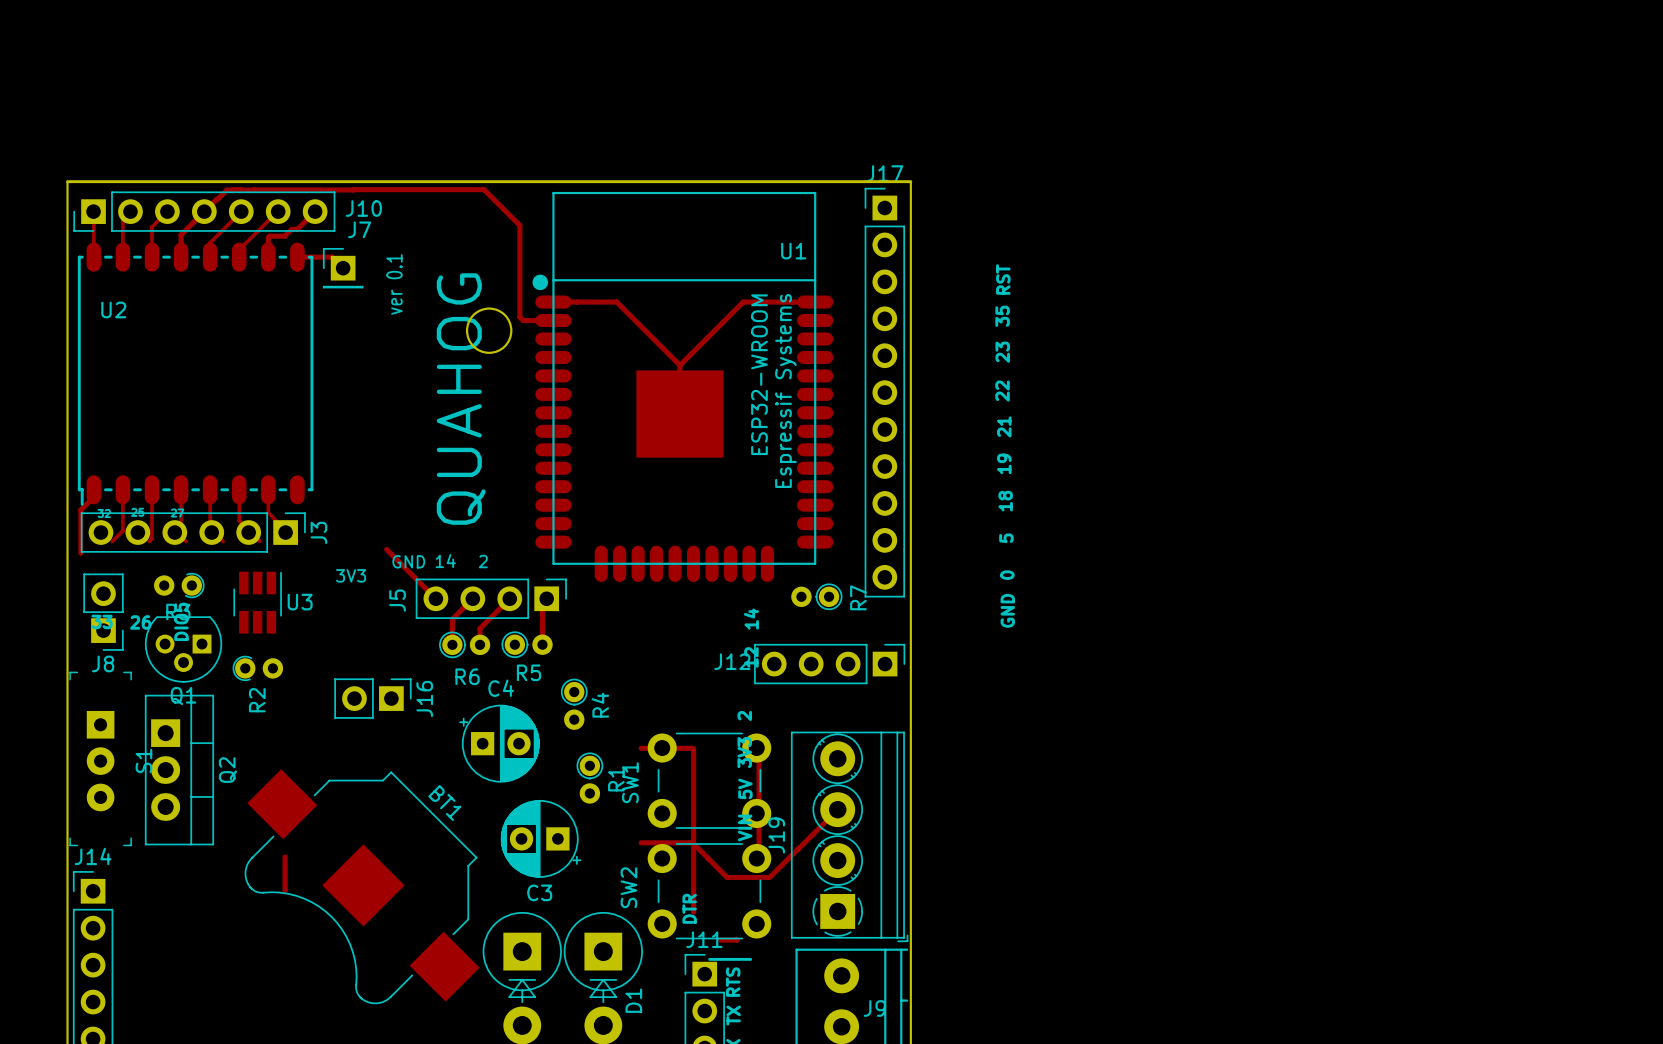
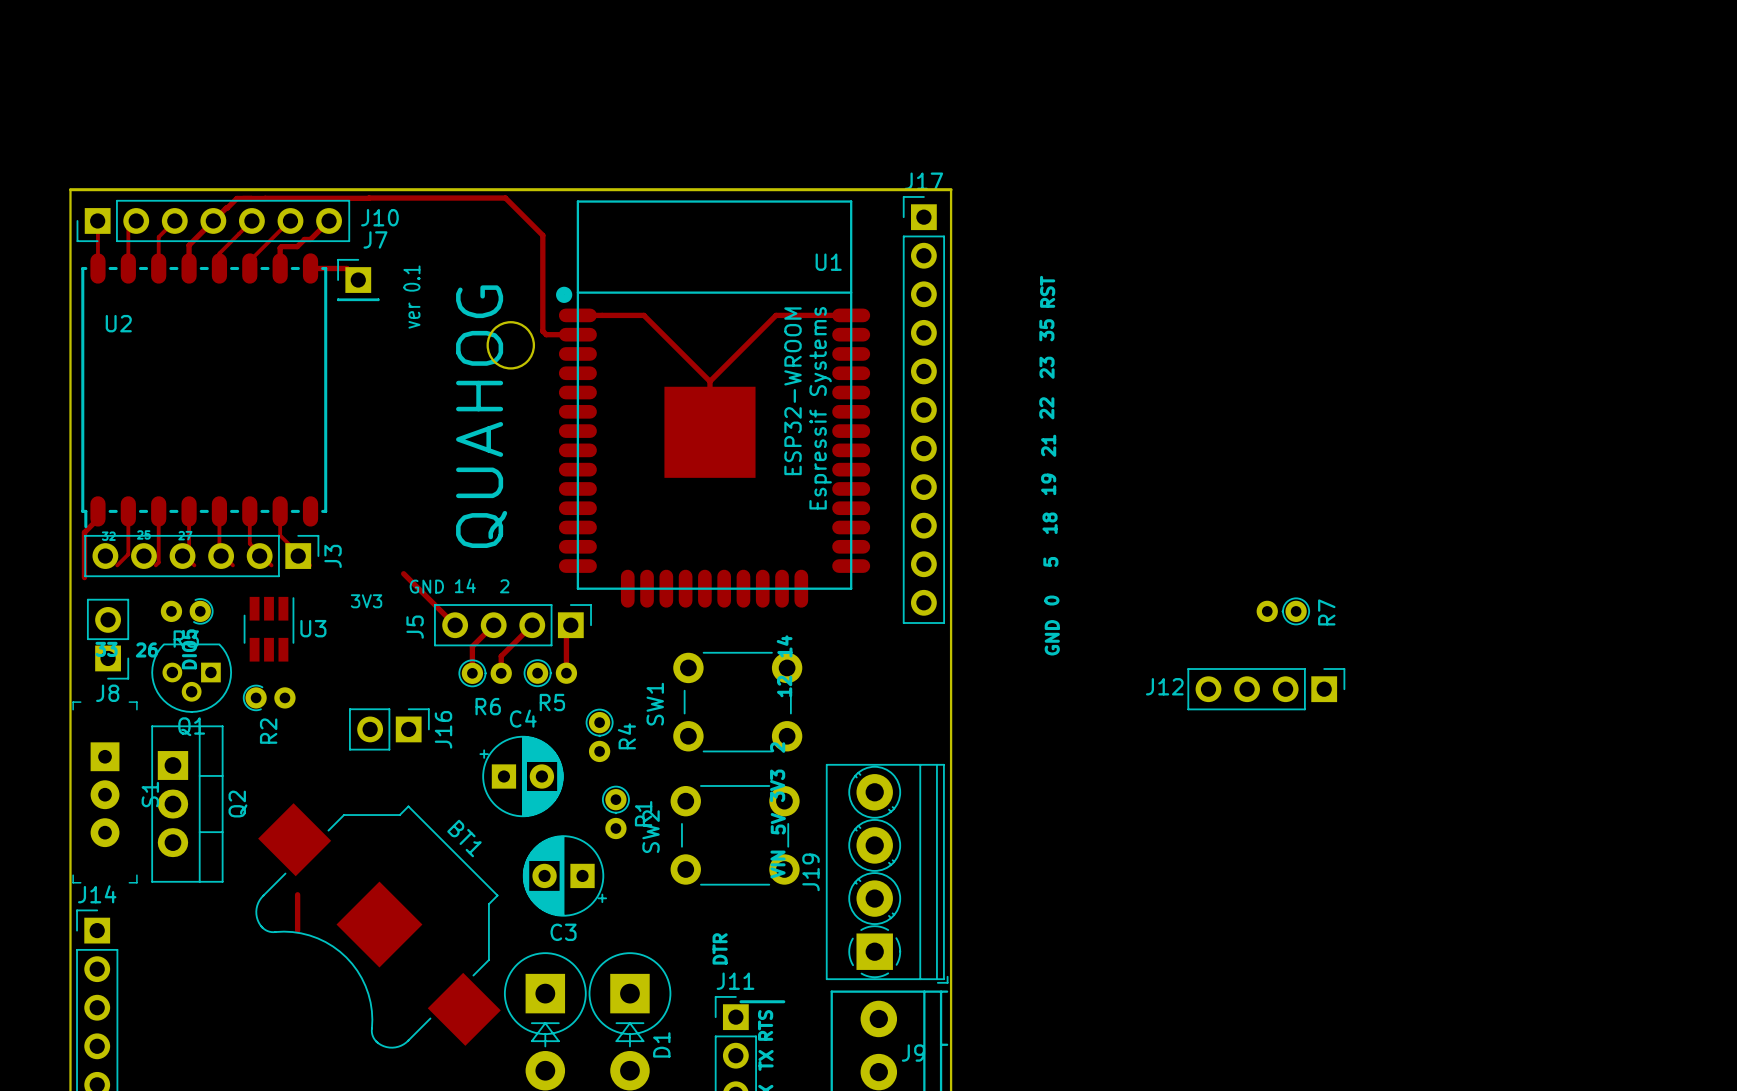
R7 position: (816, 596) -> (1283, 611)
J12 position: (829, 664) -> (1266, 689)
track: (641, 748) (693, 749) (693, 912) -> none
track: (759, 749) (759, 843) -> none
SW1 position: (709, 780) -> (737, 702)
track: (837, 809) (798, 848) -> none
track: (641, 842) (692, 842) (708, 858) -> none
track: (798, 848) (769, 877) (727, 877) (708, 858) -> none
SW2 position: (709, 891) -> (735, 835)
track: (736, 939) (720, 940) -> none

